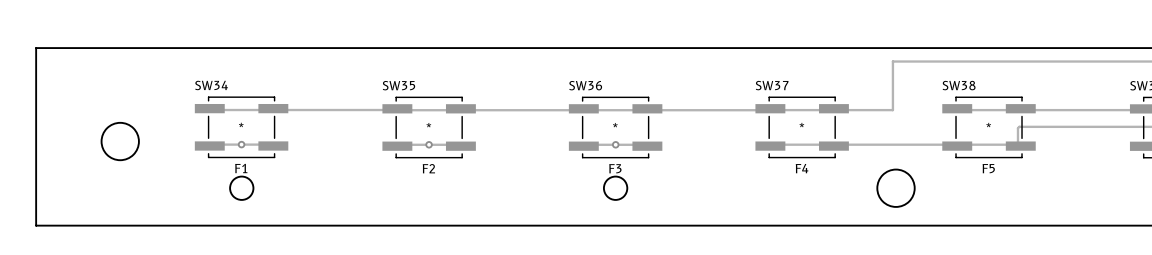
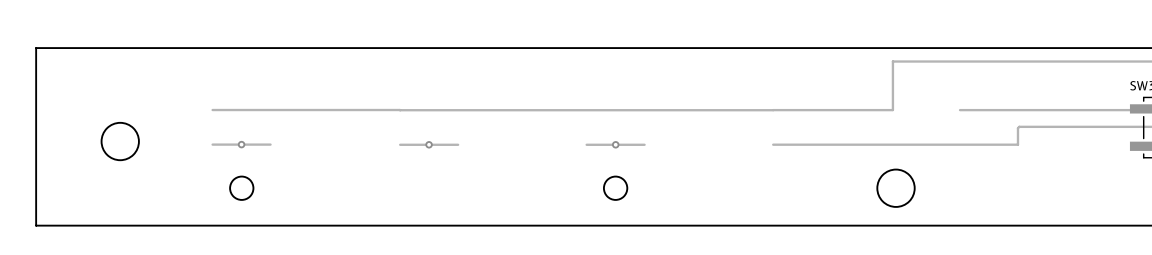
SW34: F1 (241, 127) -> none
SW35: F2 (429, 127) -> none
SW36: F3 (615, 127) -> none
SW37: F4 (802, 127) -> none
SW38: F5 (989, 127) -> none

